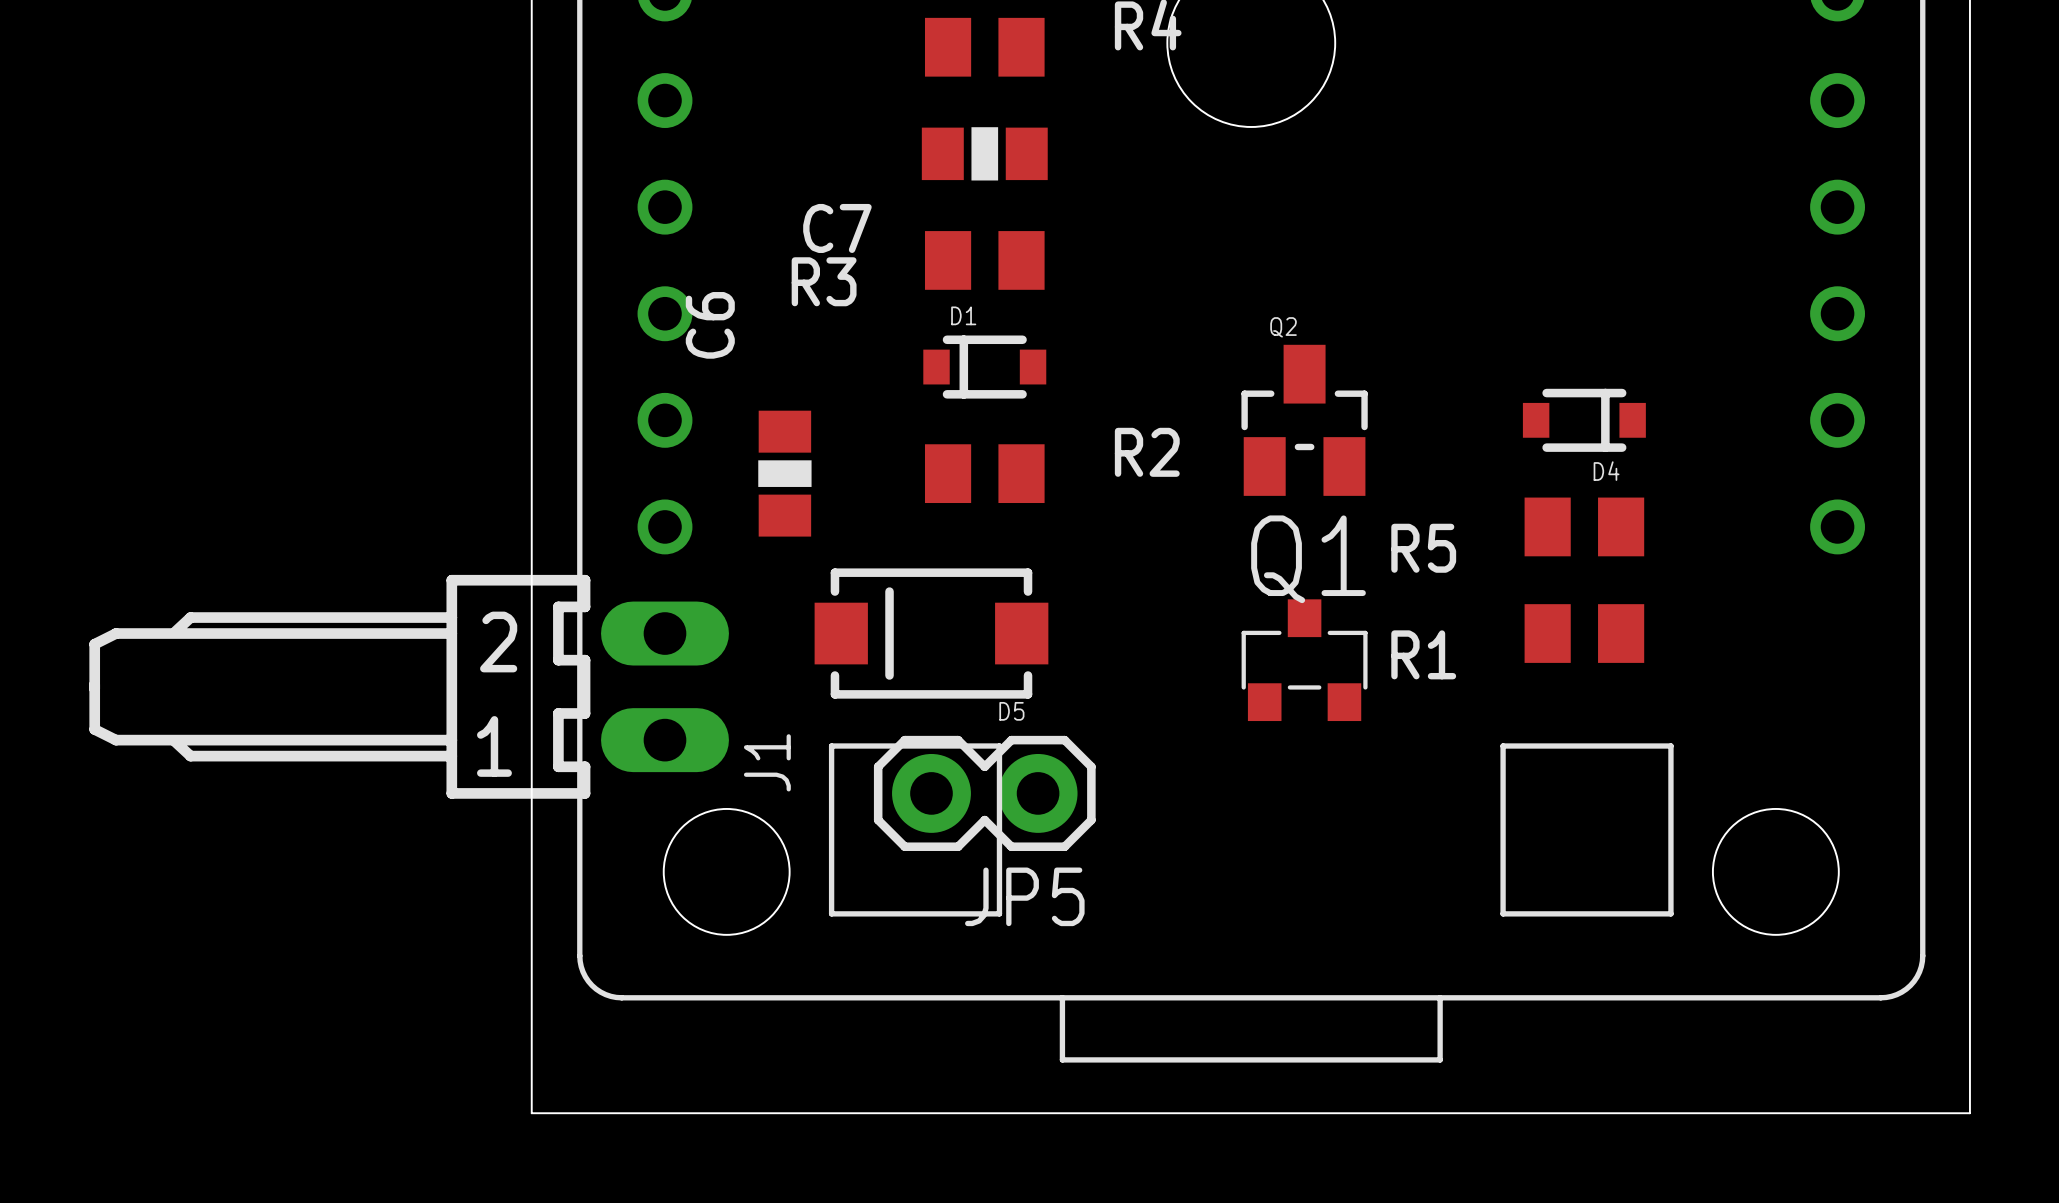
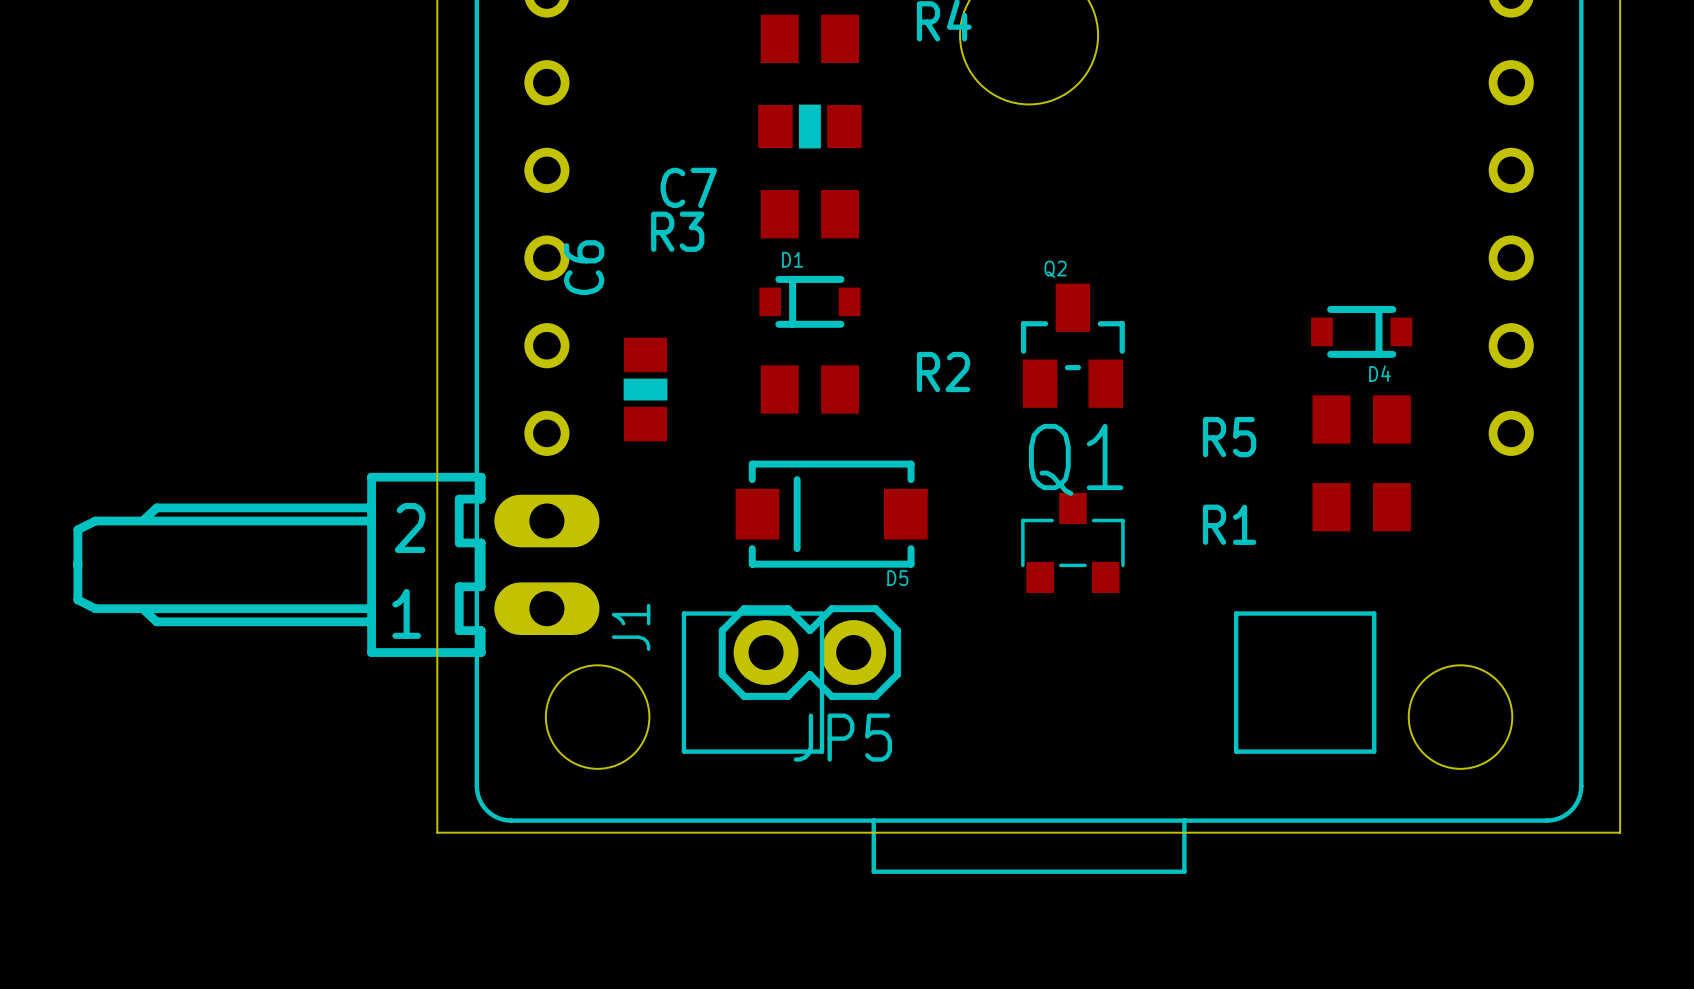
D4 position: (1584, 420) -> (1361, 331)
R5 position: (1584, 526) -> (1361, 419)
D5 position: (931, 633) -> (831, 514)
R1 position: (1584, 633) -> (1361, 507)
board edge: (531, 1012) (531, 1113) (1969, 1113) (1969, 1012) -> (437, 832) (1620, 832)

